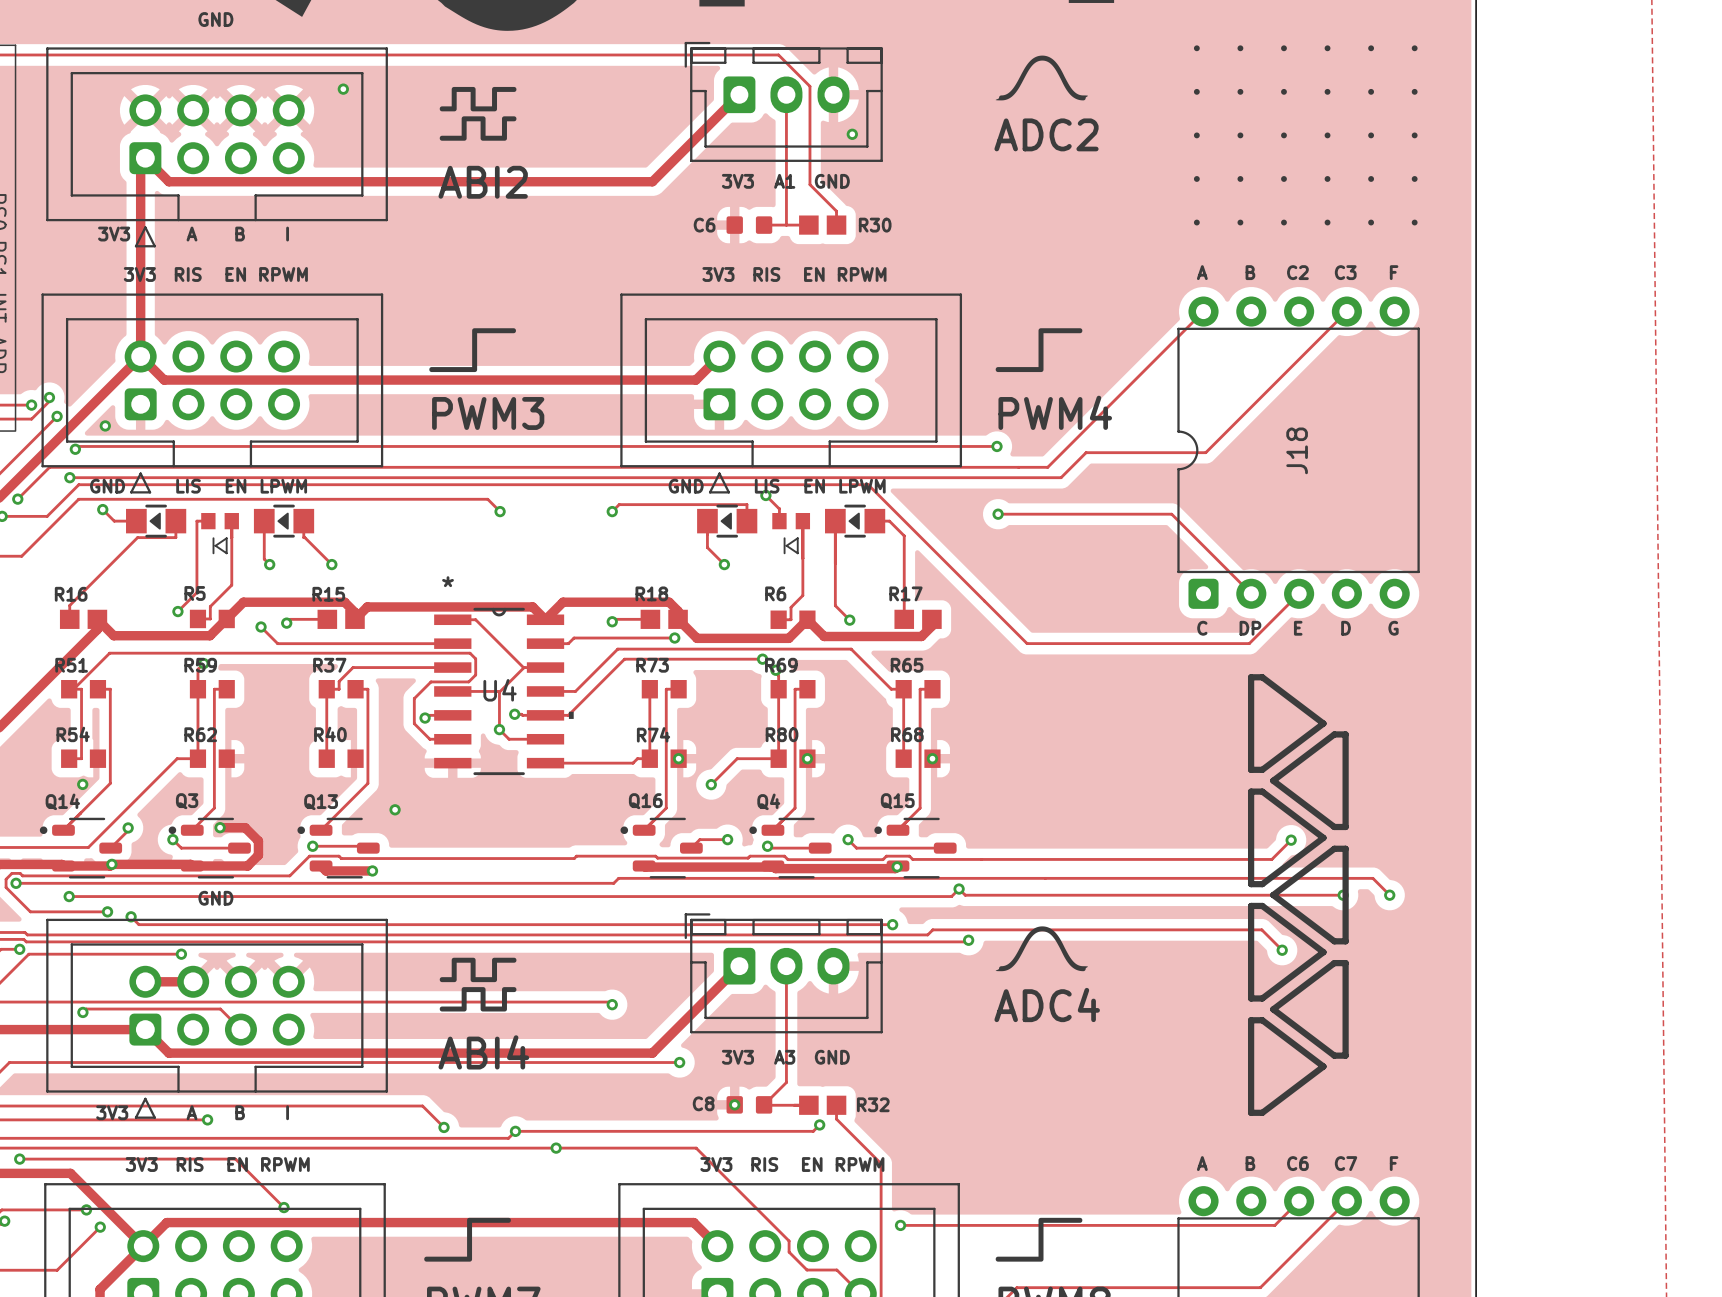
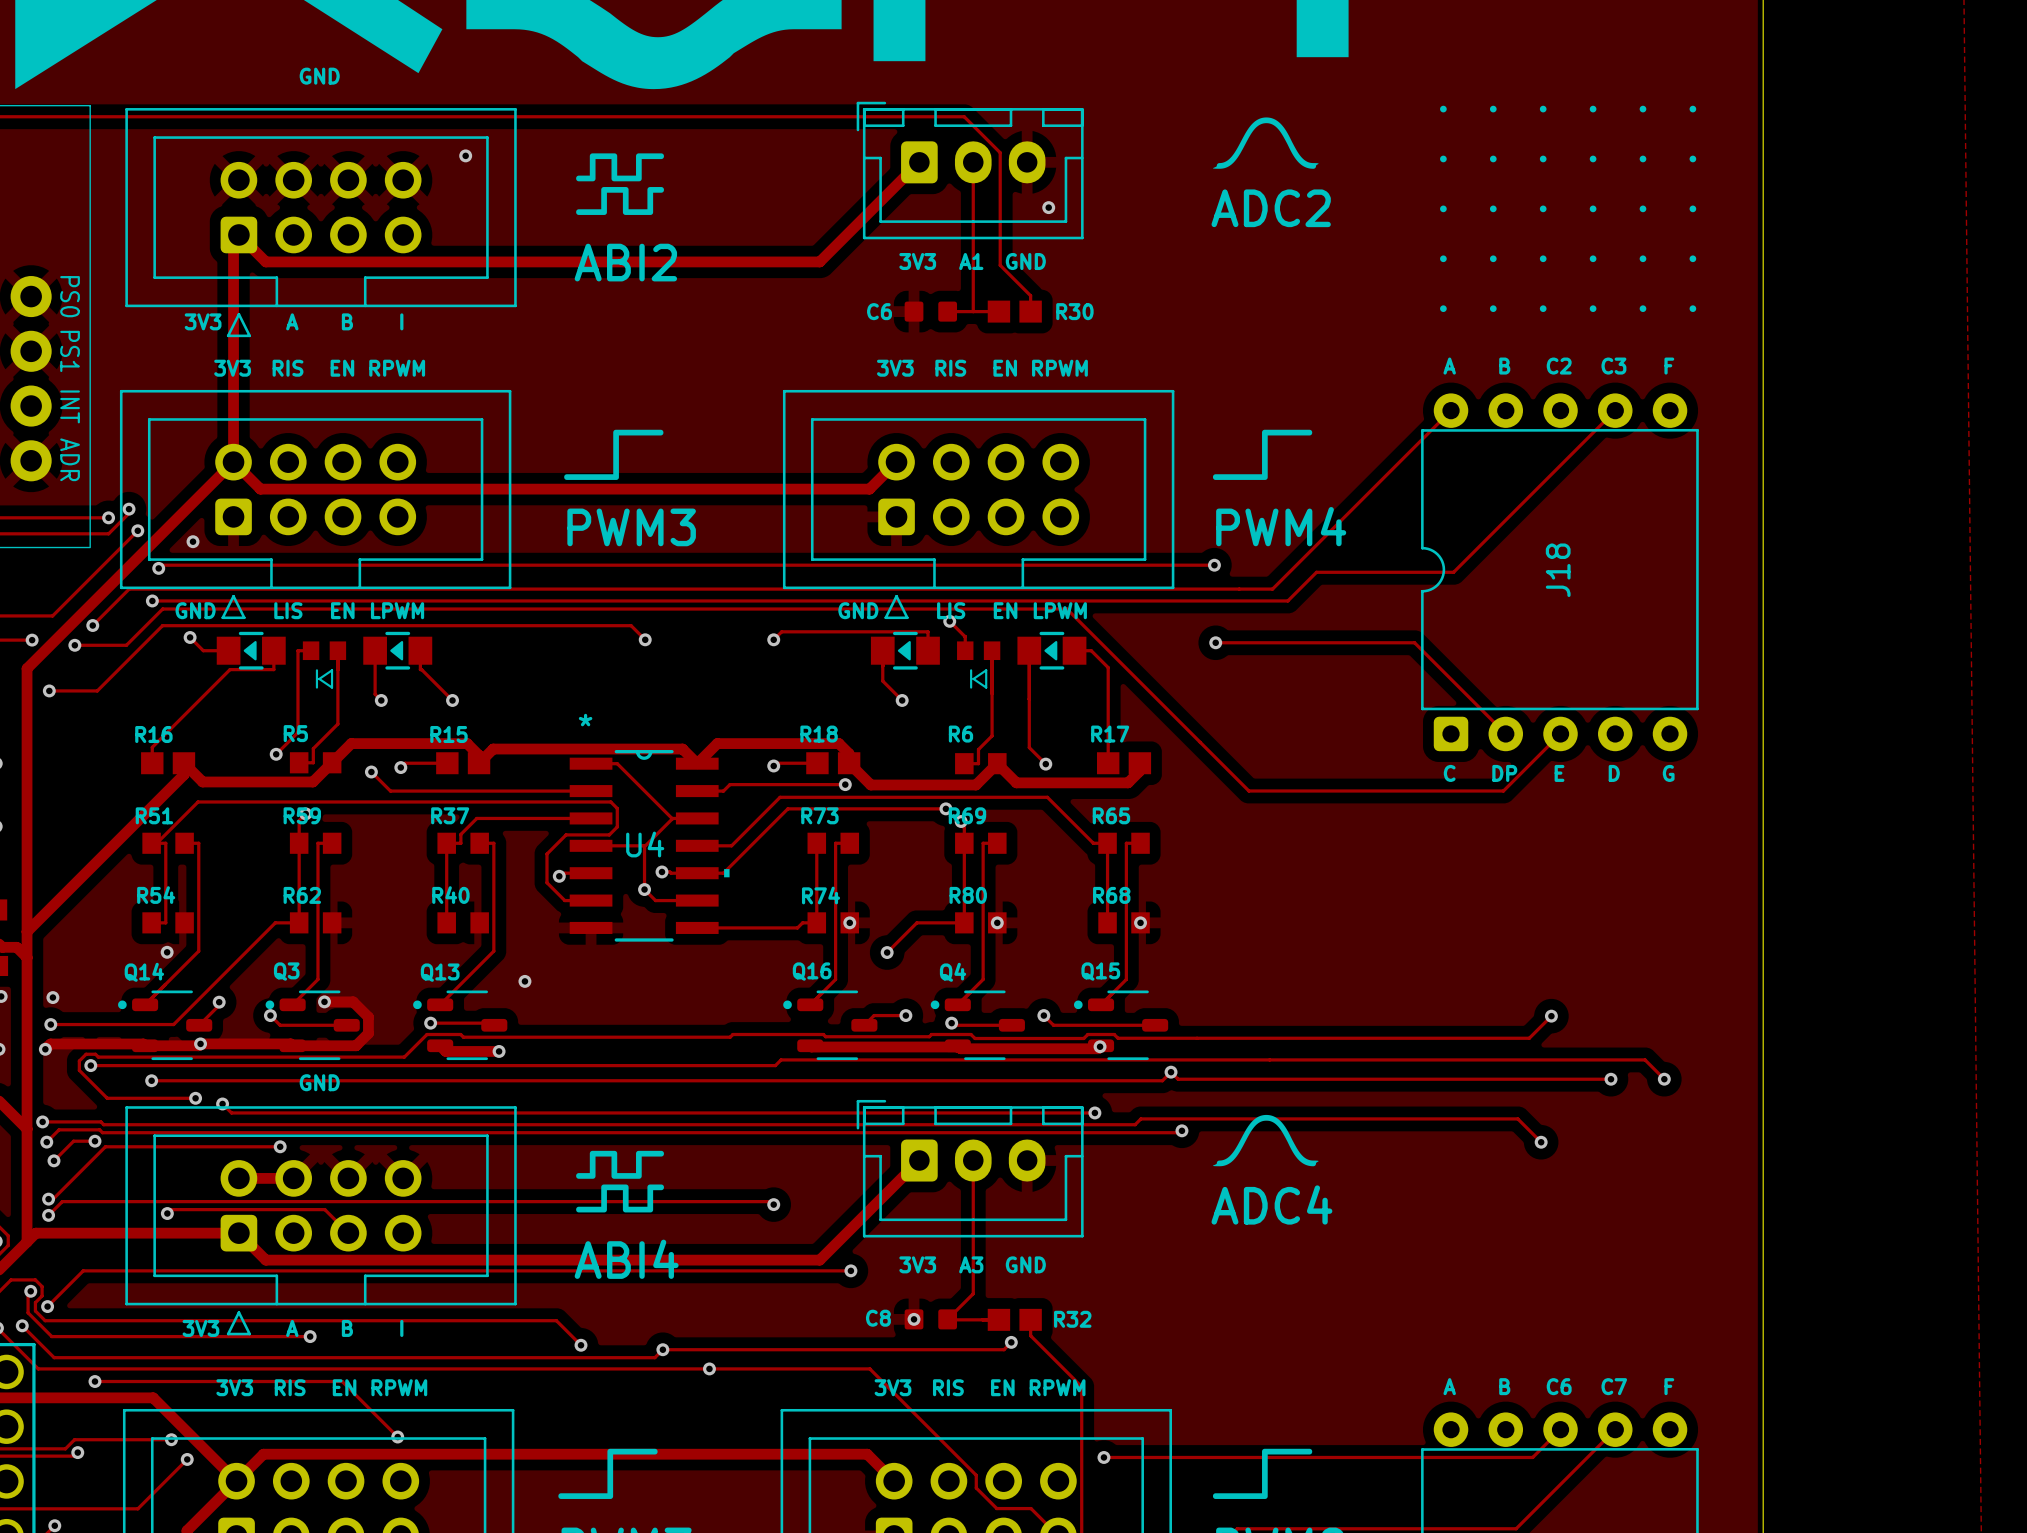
line: (1251, 677) (1251, 769) (1262, 769) (1323, 723) (1262, 677) (1251, 677) -> none
line: (1334, 734) (1273, 780) (1334, 826) (1345, 826) (1345, 734) (1334, 734) -> none
line: (1251, 791) (1251, 884) (1262, 884) (1323, 837) (1262, 791) (1251, 791) -> none
line: (1334, 848) (1273, 895) (1334, 941) (1345, 941) (1345, 848) (1334, 848) -> none
line: (1251, 905) (1251, 998) (1262, 998) (1323, 952) (1262, 905) (1251, 905) -> none
line: (1334, 963) (1273, 1009) (1334, 1055) (1345, 1055) (1345, 963) (1334, 963) -> none
line: (1251, 1020) (1251, 1112) (1262, 1112) (1323, 1066) (1262, 1020) (1251, 1020) -> none

